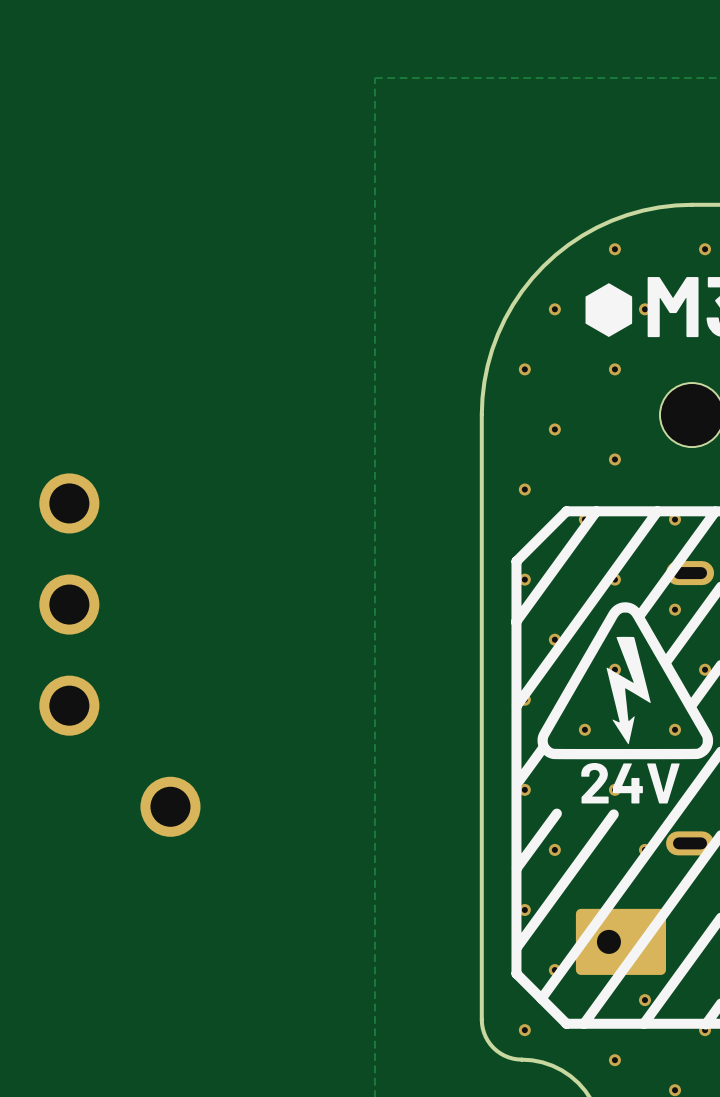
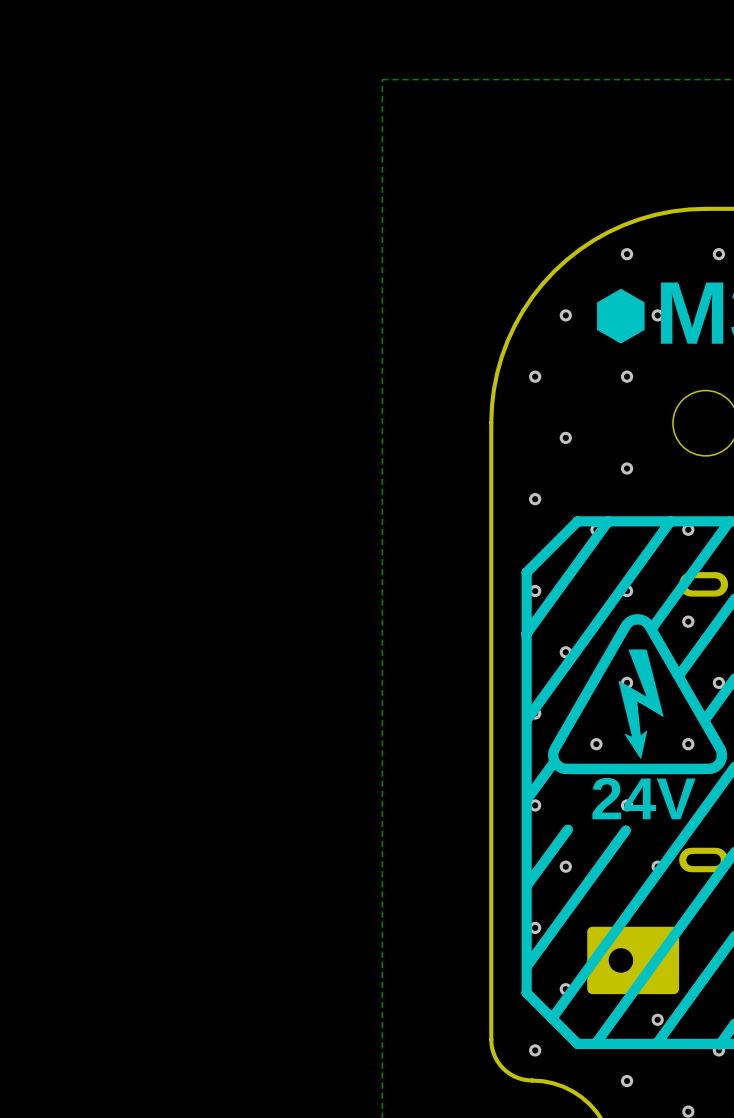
part: (69, 503) -> none
part: (69, 604) -> none
part: (69, 705) -> none
part: (170, 806) -> none

